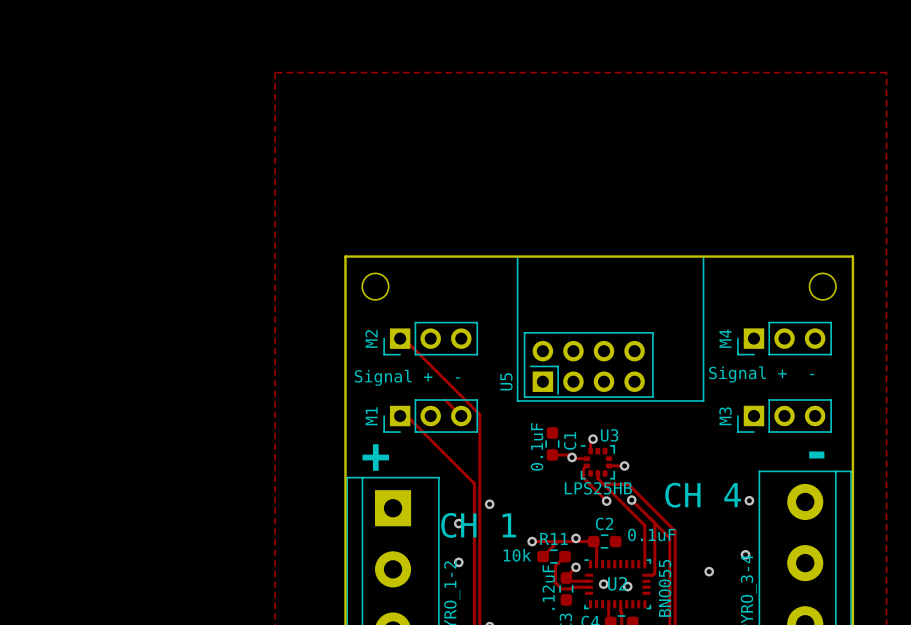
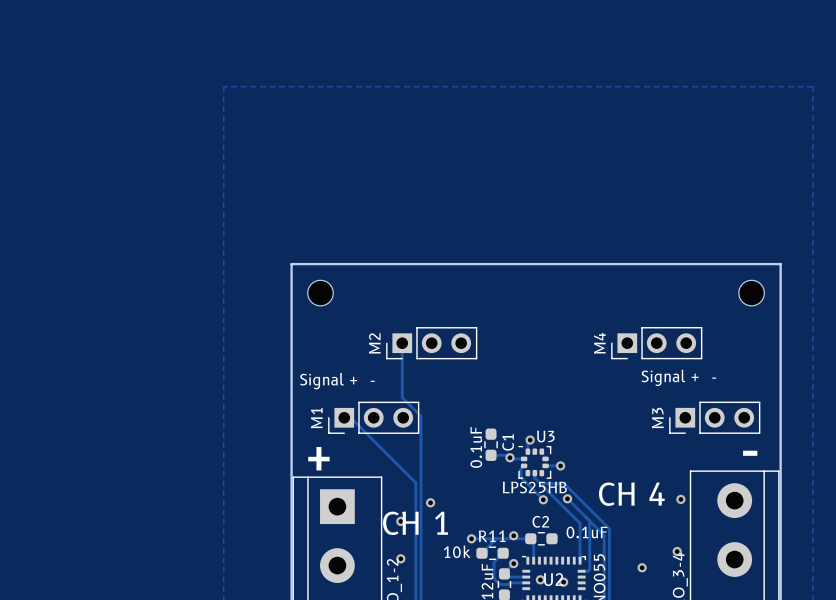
U5: (610, 329) -> none
track: (400, 338) (403, 338) (460, 395) -> (402, 343) (402, 397)
M2 position: (430, 338) -> (431, 343)
M4 position: (784, 338) -> (656, 343)
track: (445, 399) (461, 416) -> none

